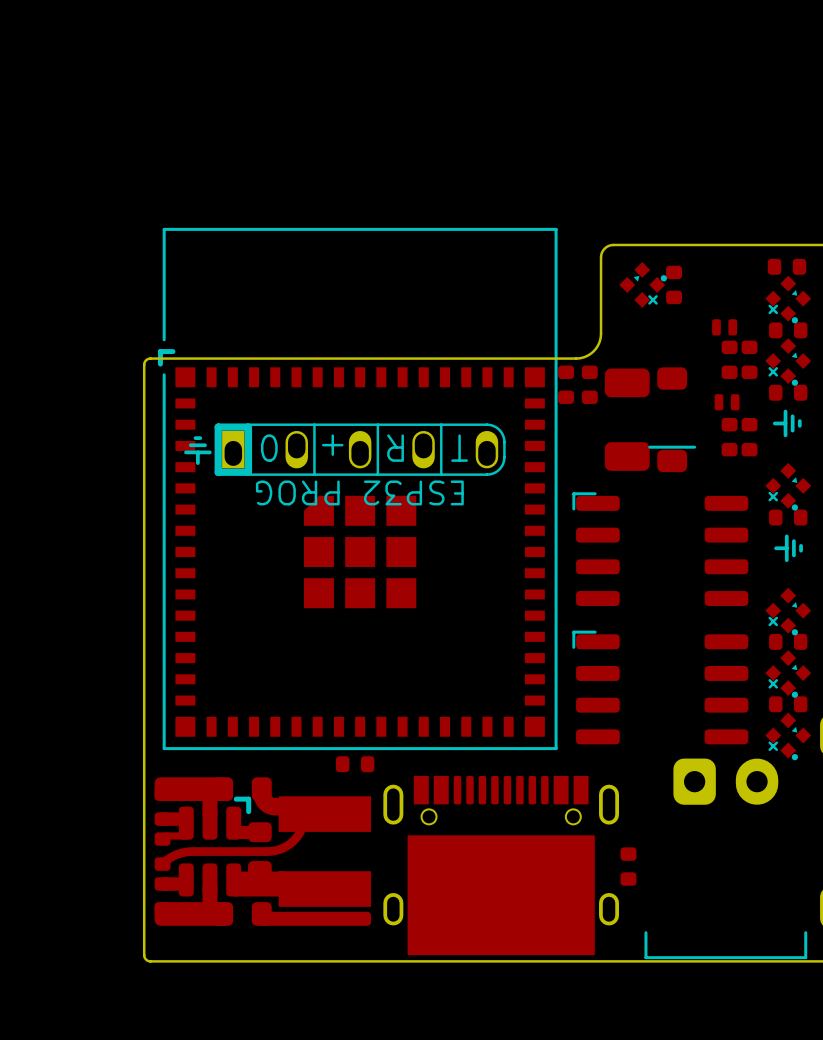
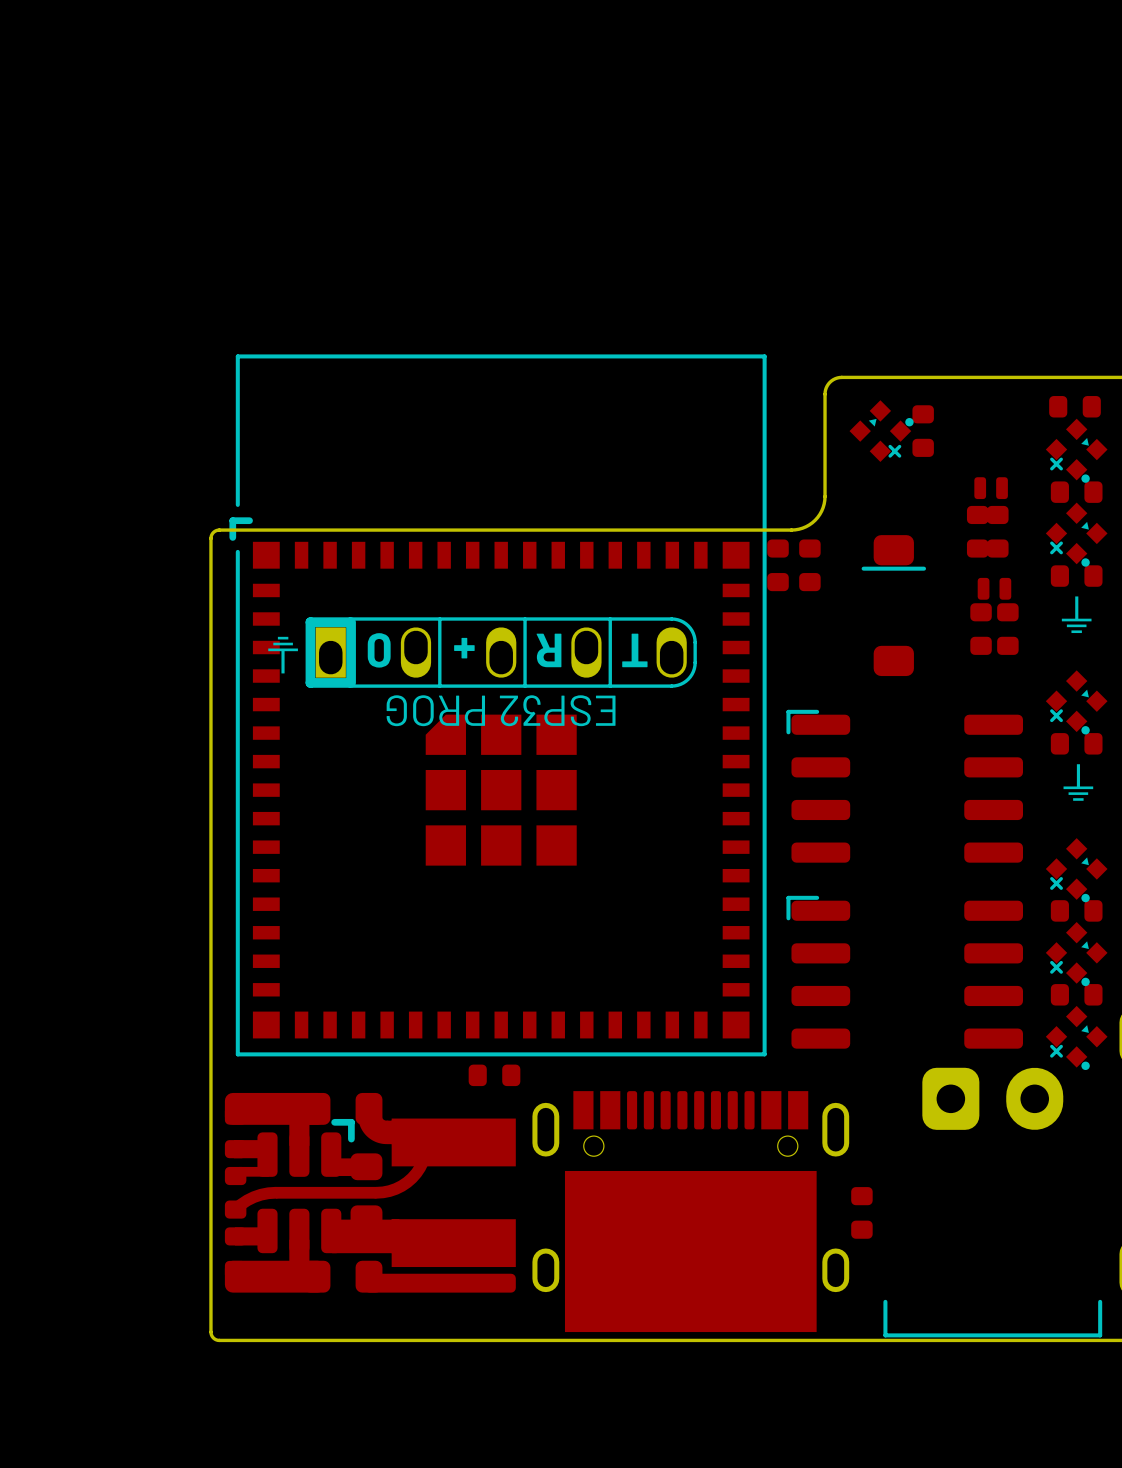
part position: (749, 359) -> (977, 531)
part: (627, 419) -> none
part rotation: 0° (672, 419) -> 180° (893, 605)
text rotation: 0° (787, 423) -> 90° clockwise (1076, 614)
part: none -> (981, 629)
part: none -> (1007, 629)
part: (729, 437) -> none
part: (749, 437) -> none
text rotation: 0° (788, 548) -> 90° clockwise (1078, 782)

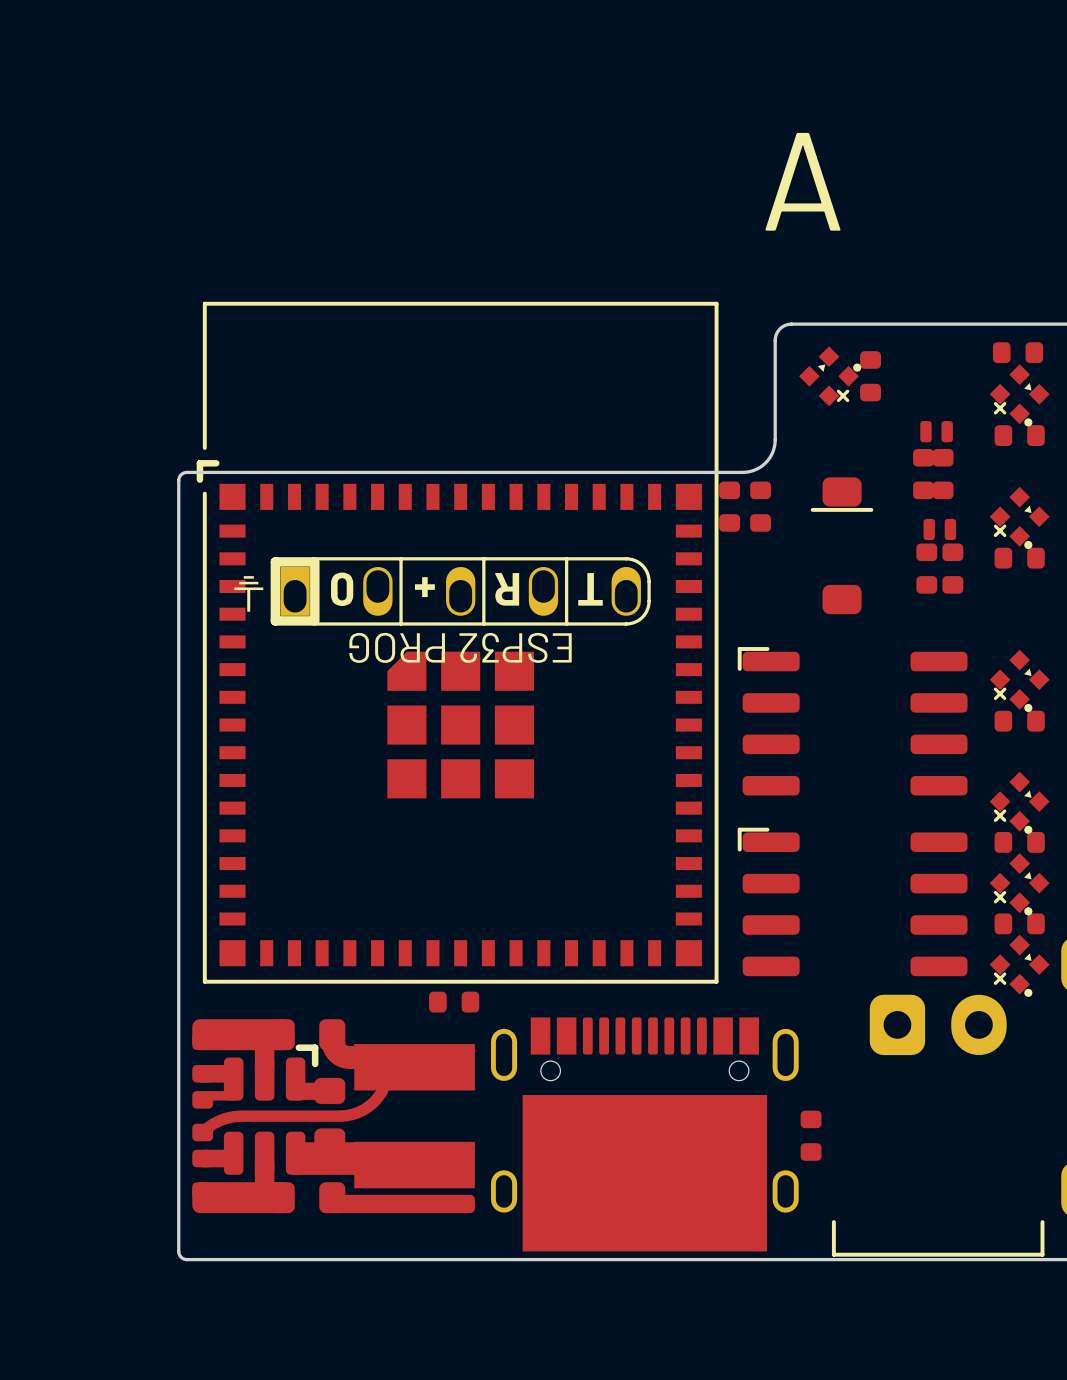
text: none -> A (802, 181)
part: (1076, 534) -> none
part footprint: [1050, 565, 1103, 587] -> [989, 486, 1050, 550]
text: ⏚ (1076, 614) -> none
part: none -> (1019, 558)
part: (1076, 702) -> none
part footprint: [1050, 733, 1103, 755] -> [989, 649, 1050, 713]
text: ⏚ (1078, 782) -> none
part: none -> (1019, 721)

